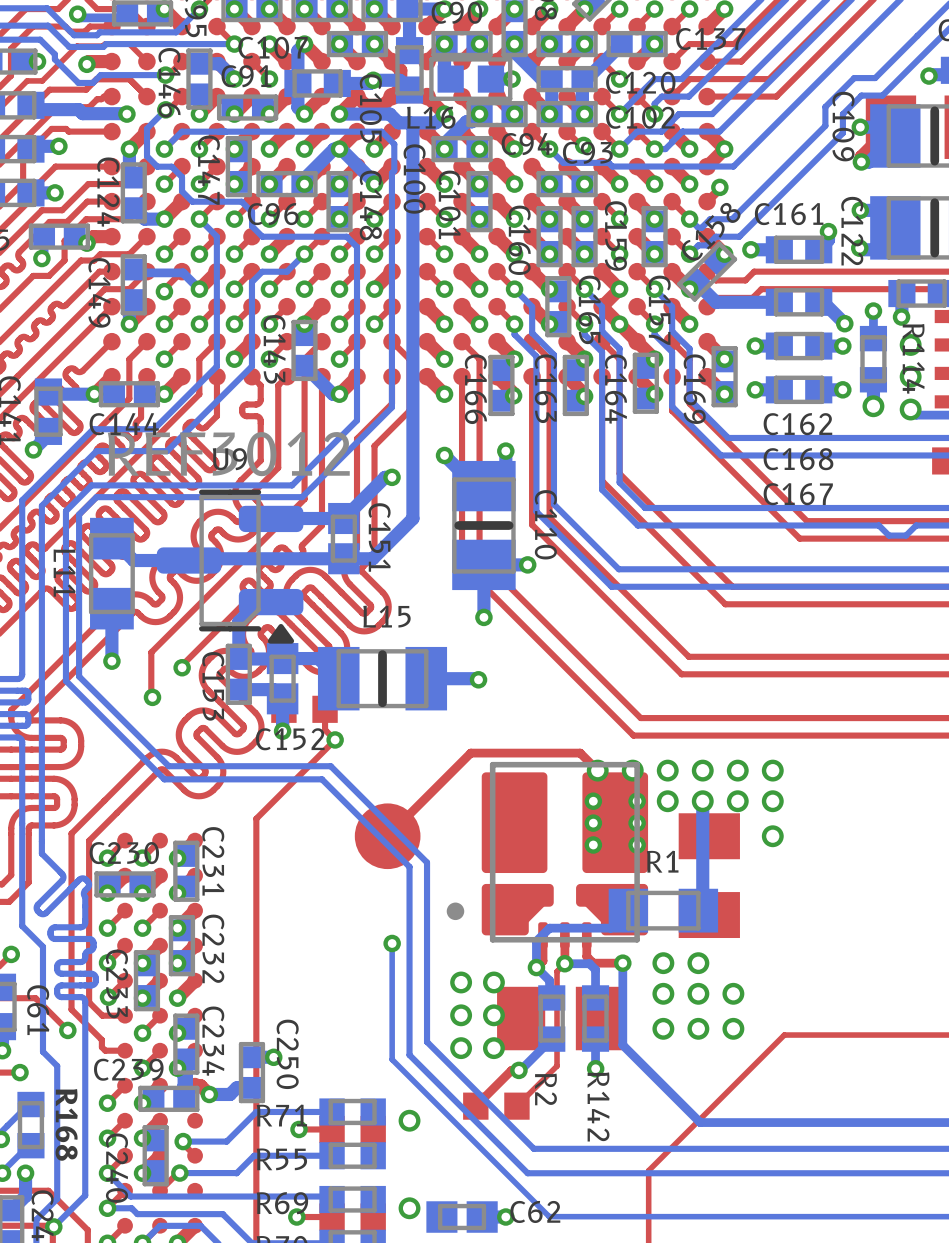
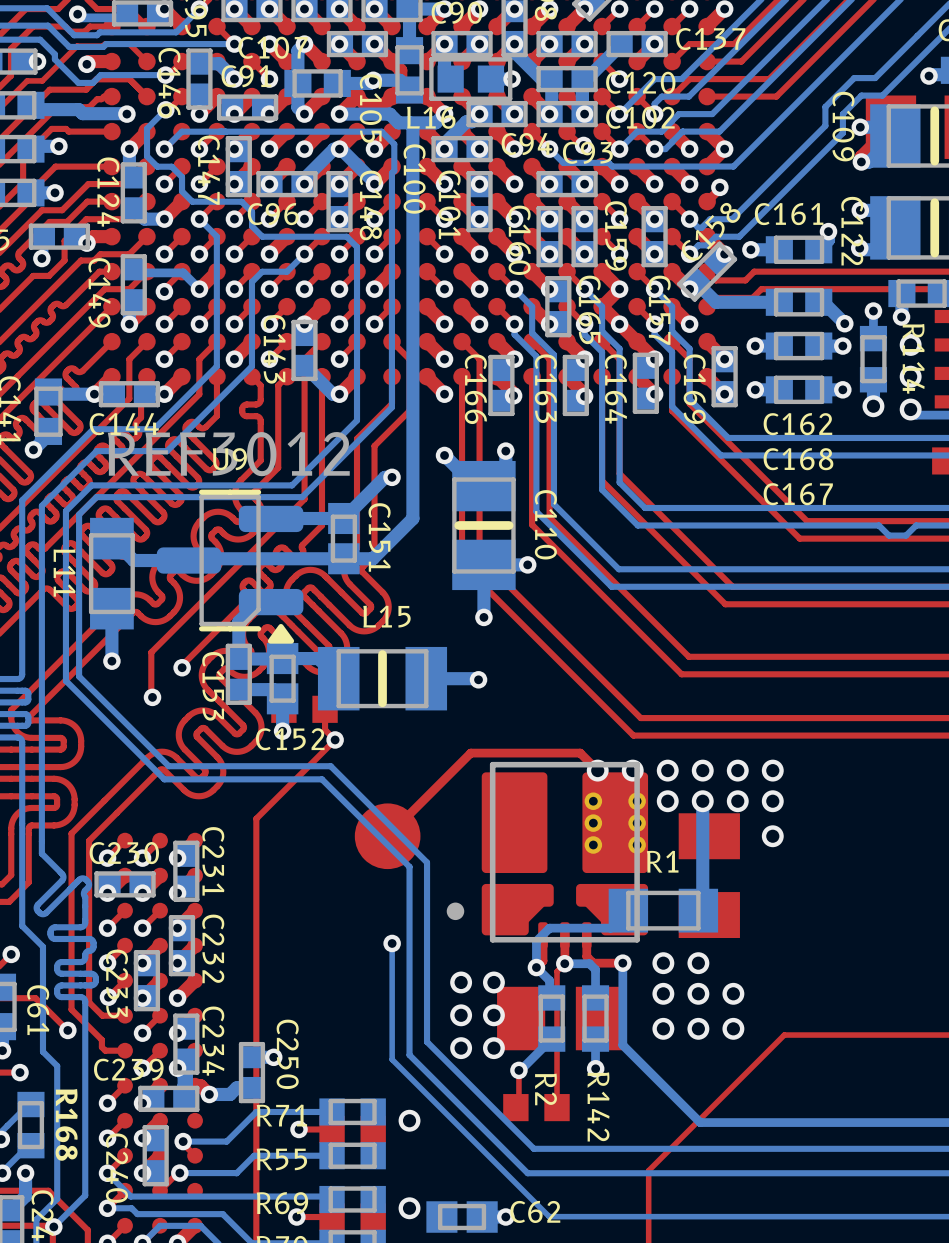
top track: (557, 1066) (516, 1106) -> (557, 1066) (557, 1107)
top track: (518, 1070) (511, 1070) (475, 1106) -> (518, 1070) (518, 1104)
part position: (496, 1106) -> (536, 1107)

